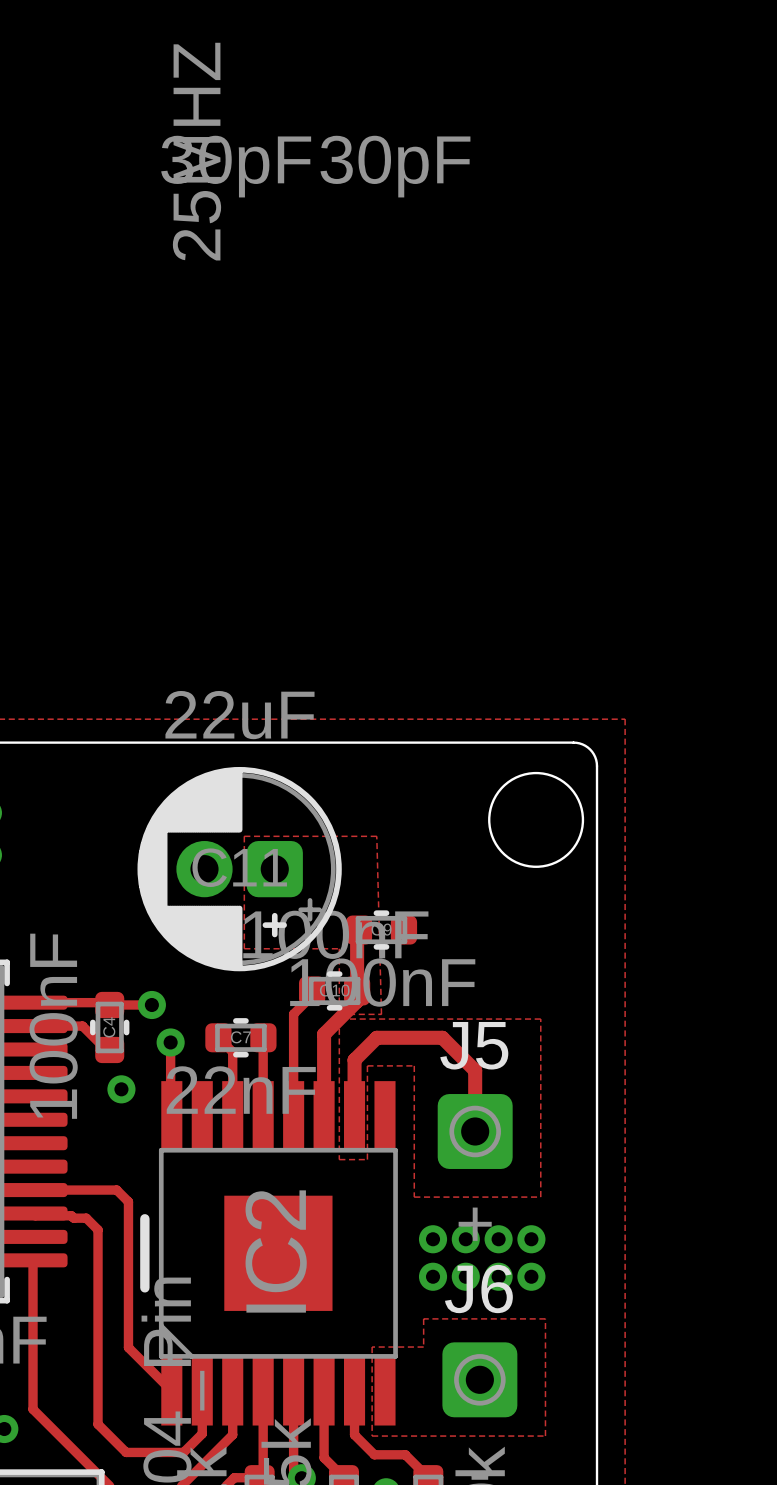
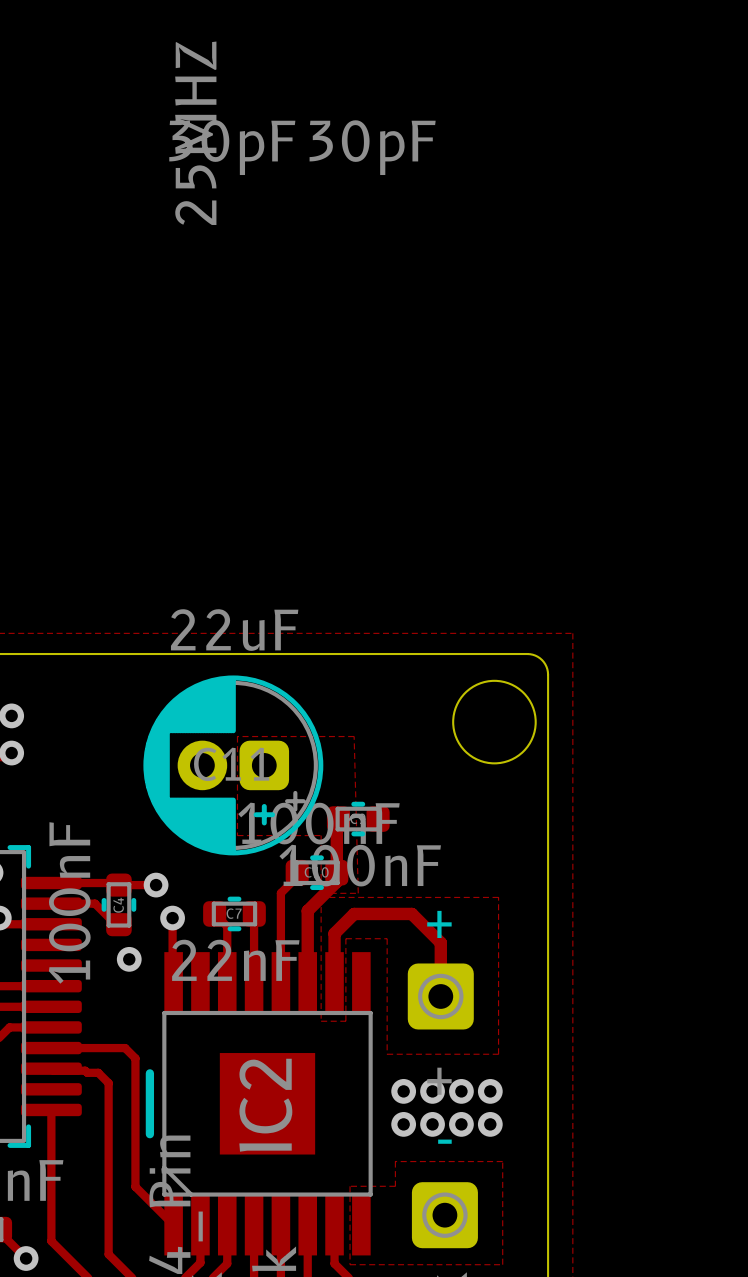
J5 name: J5 (474, 1045) -> + (439, 924)
J6 name: J6 (478, 1289) -> - (444, 1141)

